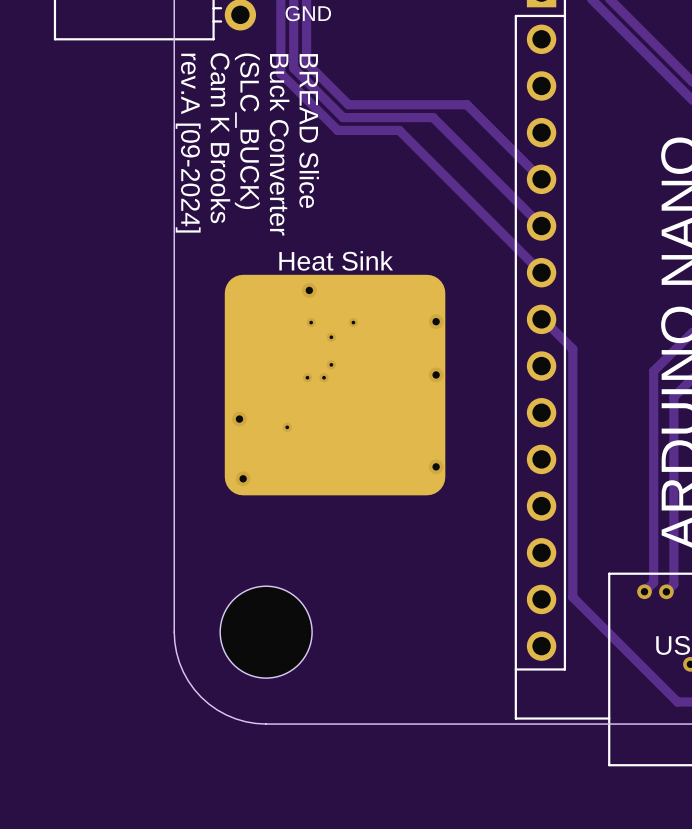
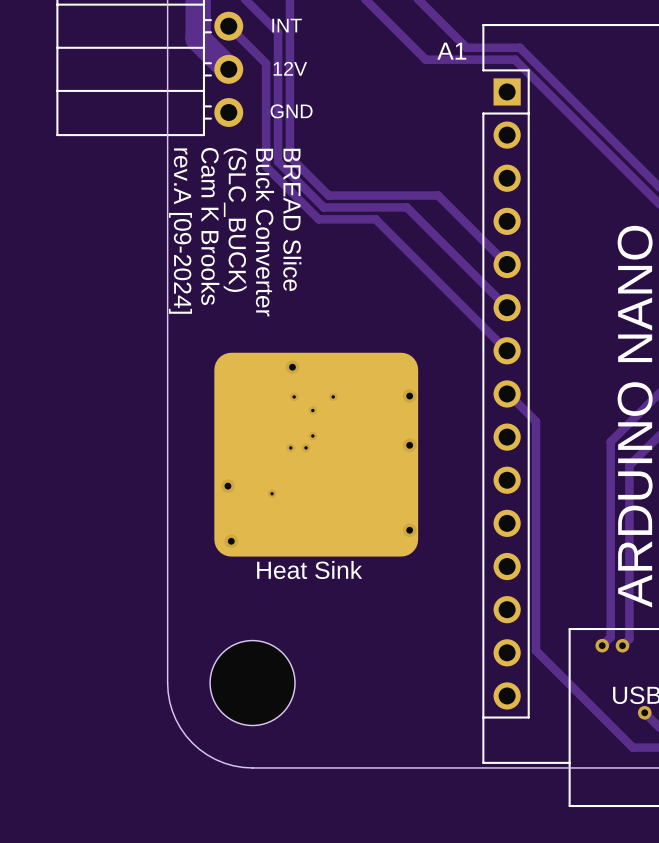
part text position: Heat Sink (336, 260) -> Heat Sink (309, 569)

